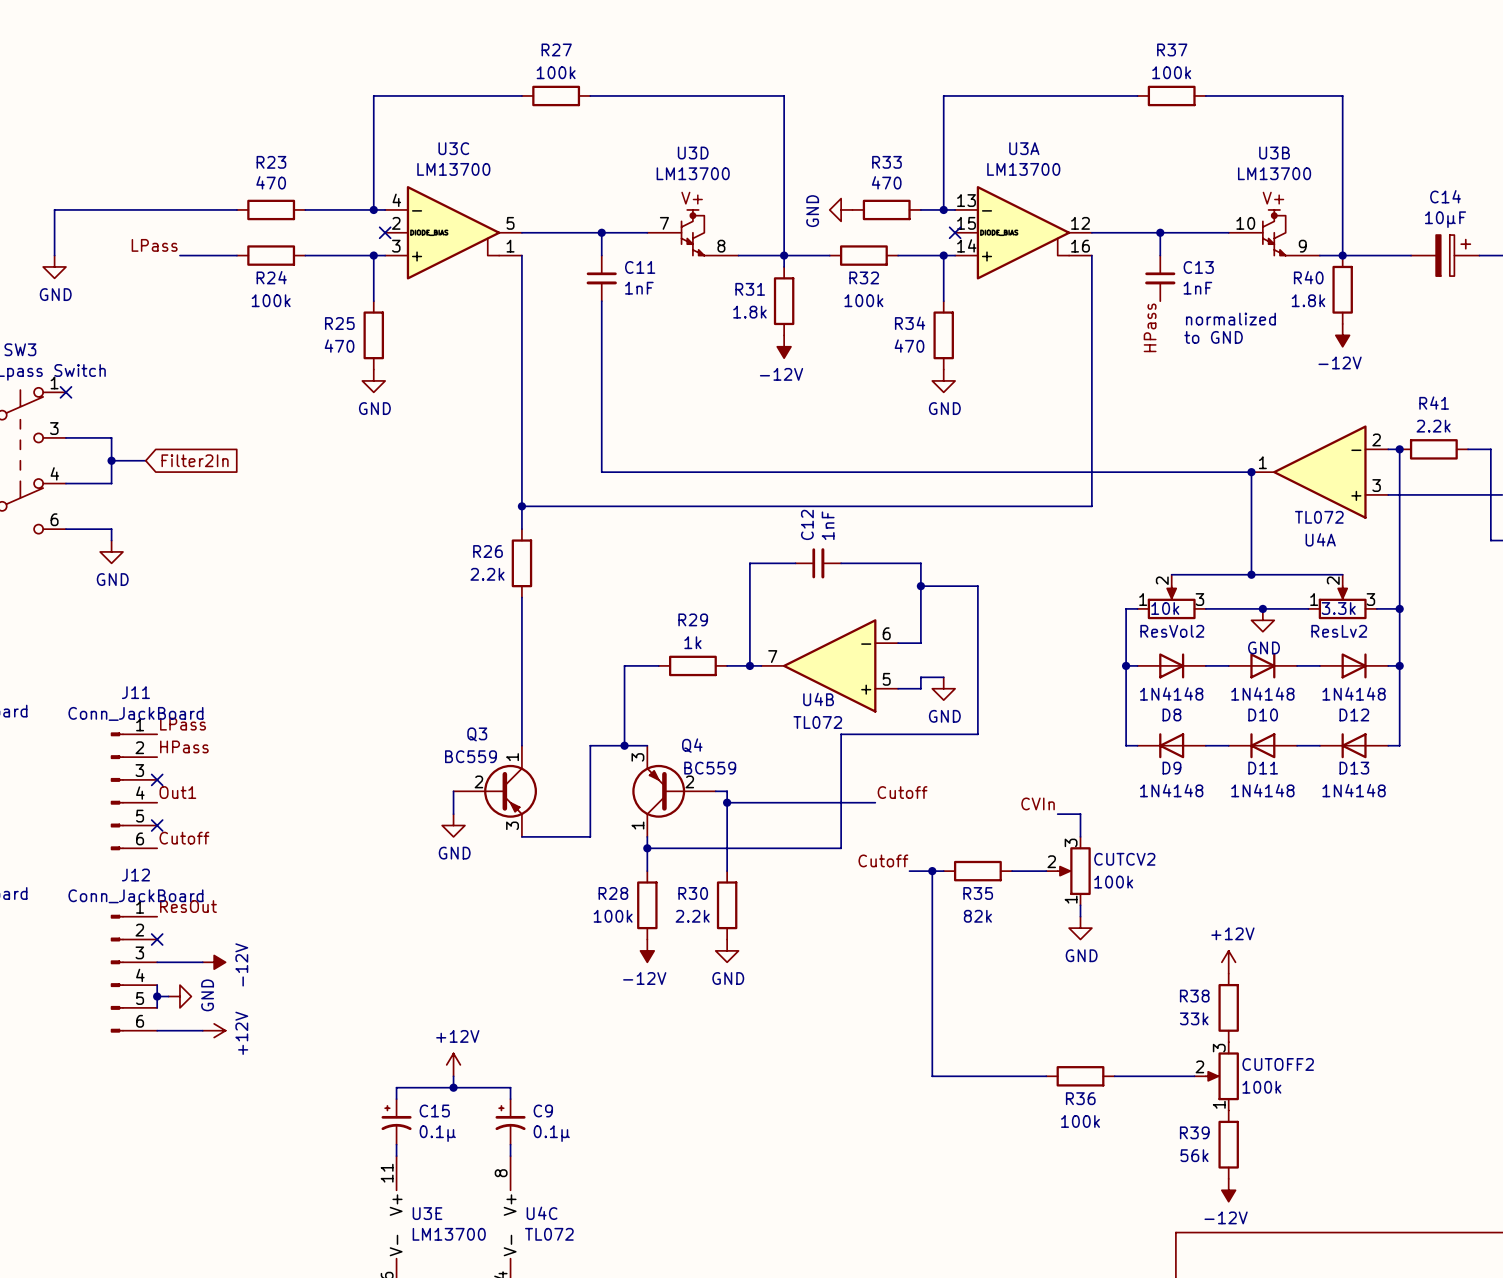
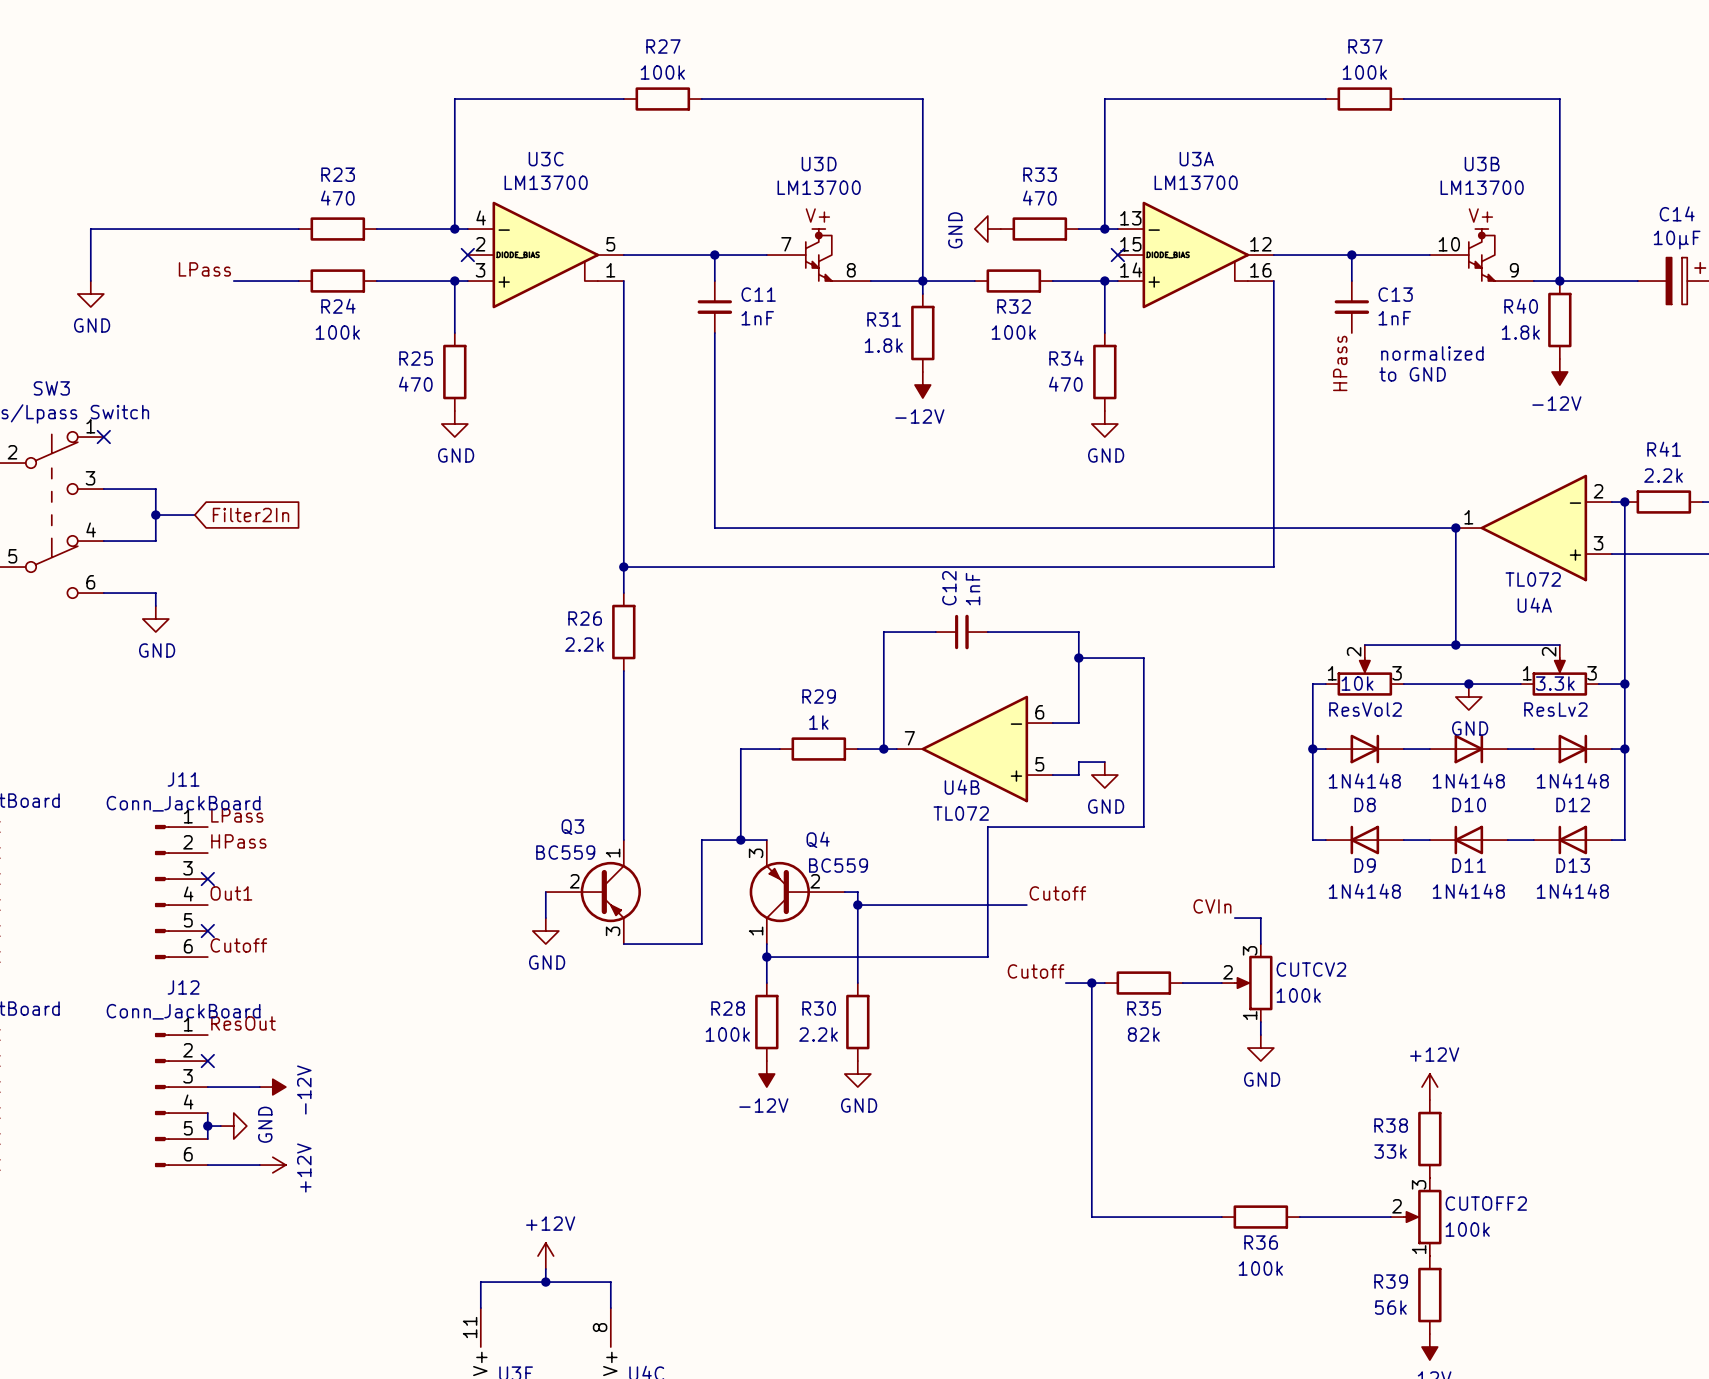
power symbol position: +12V (453, 1064) -> +12V (545, 1256)
junction position: (453, 1087) -> (545, 1282)
wire: (396, 1099) (396, 1087) (510, 1087) (510, 1099) -> (480, 1295) (480, 1282) (610, 1282) (610, 1295)
C15: 0.1µ (396, 1121) -> none
C9: 0.1µ (510, 1121) -> none

